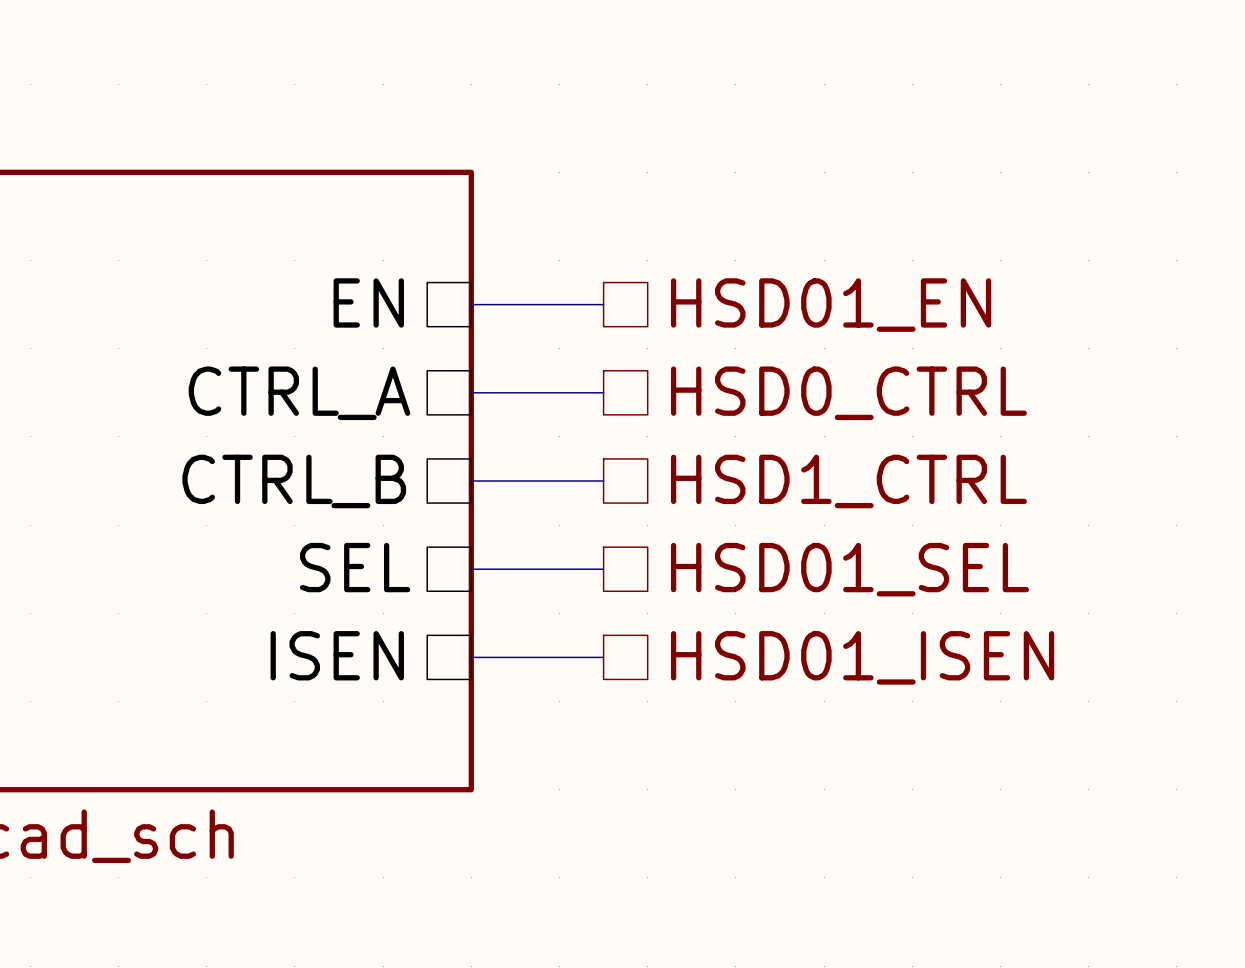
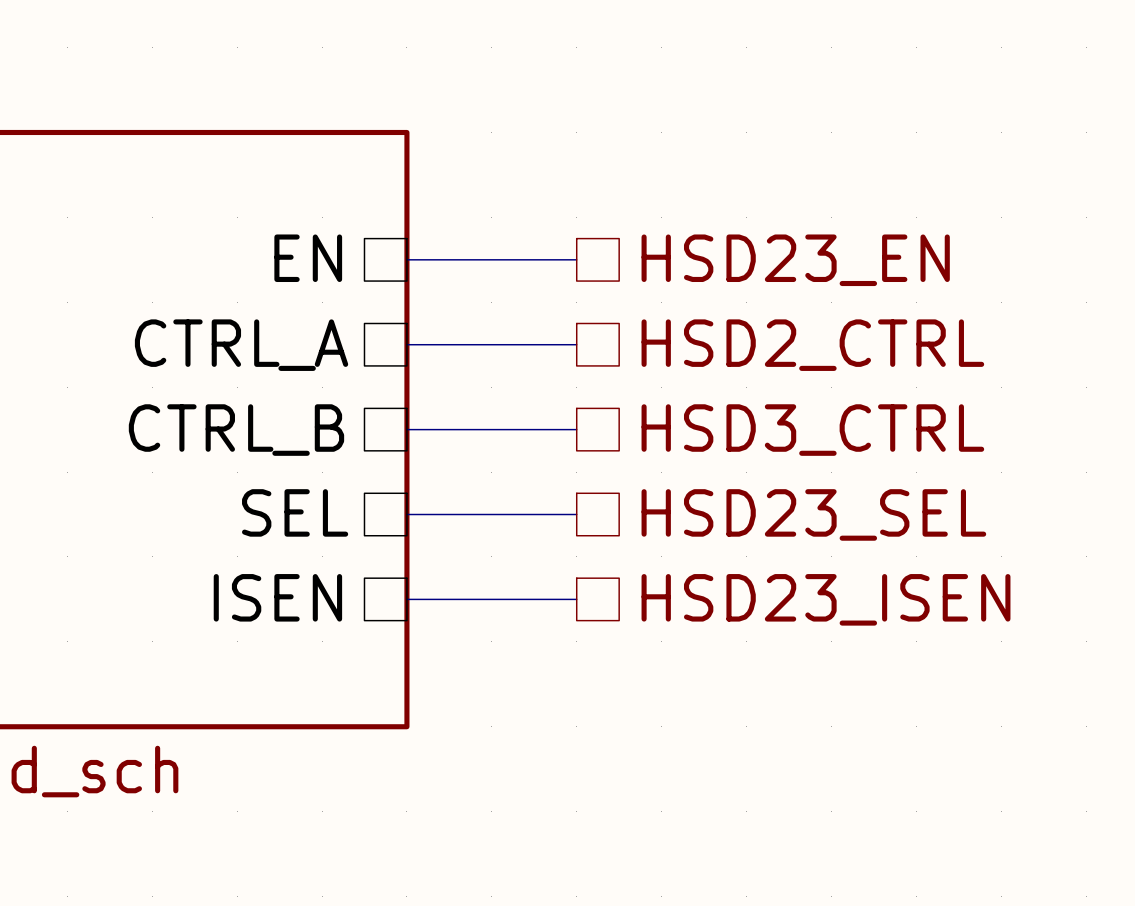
wire: none -> (534, 259) (576, 259)
hierarchical label: HSD01_EN (831, 305) -> HSD23_EN (795, 260)
wire: none -> (534, 344) (576, 344)
hierarchical label: HSD0_CTRL (848, 393) -> HSD2_CTRL (812, 345)
wire: none -> (534, 429) (576, 429)
hierarchical label: HSD1_CTRL (848, 481) -> HSD3_CTRL (812, 430)
wire: none -> (534, 514) (576, 514)
hierarchical label: HSD01_SEL (849, 569) -> HSD23_SEL (813, 514)
wire: none -> (534, 599) (576, 599)
hierarchical label: HSD01_ISEN (862, 657) -> HSD23_ISEN (826, 599)

